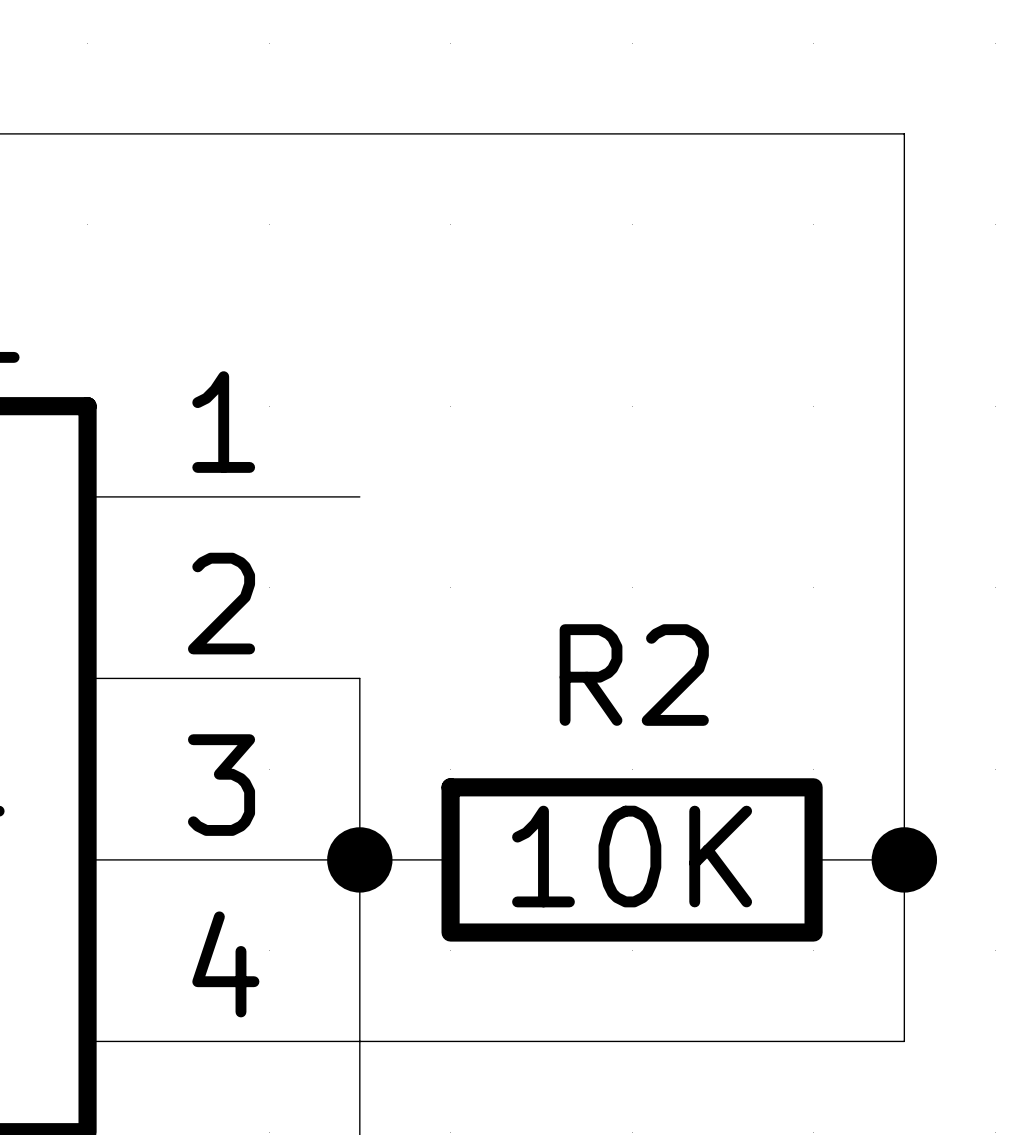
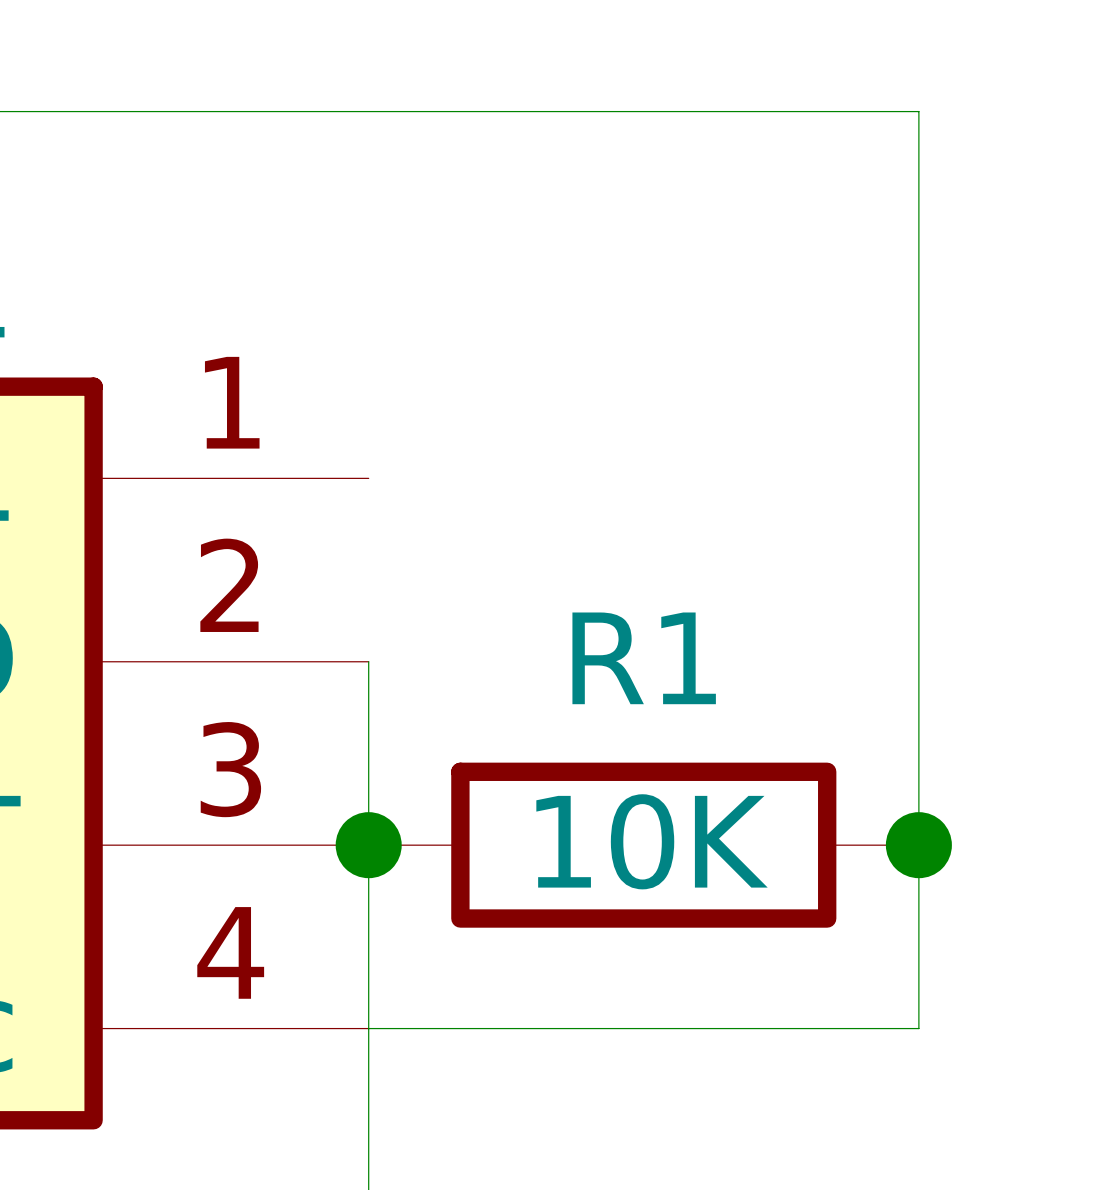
R2 name: R2 (634, 675) -> R1 (644, 658)

